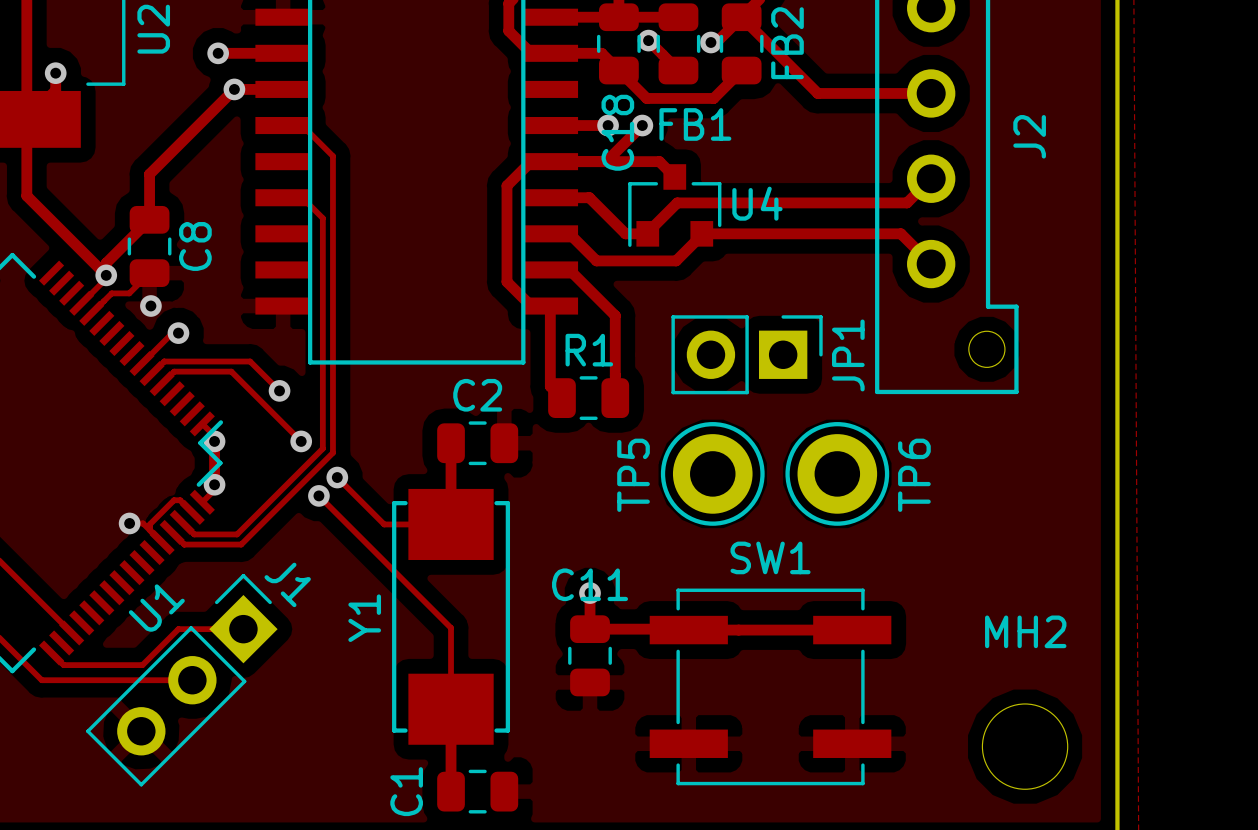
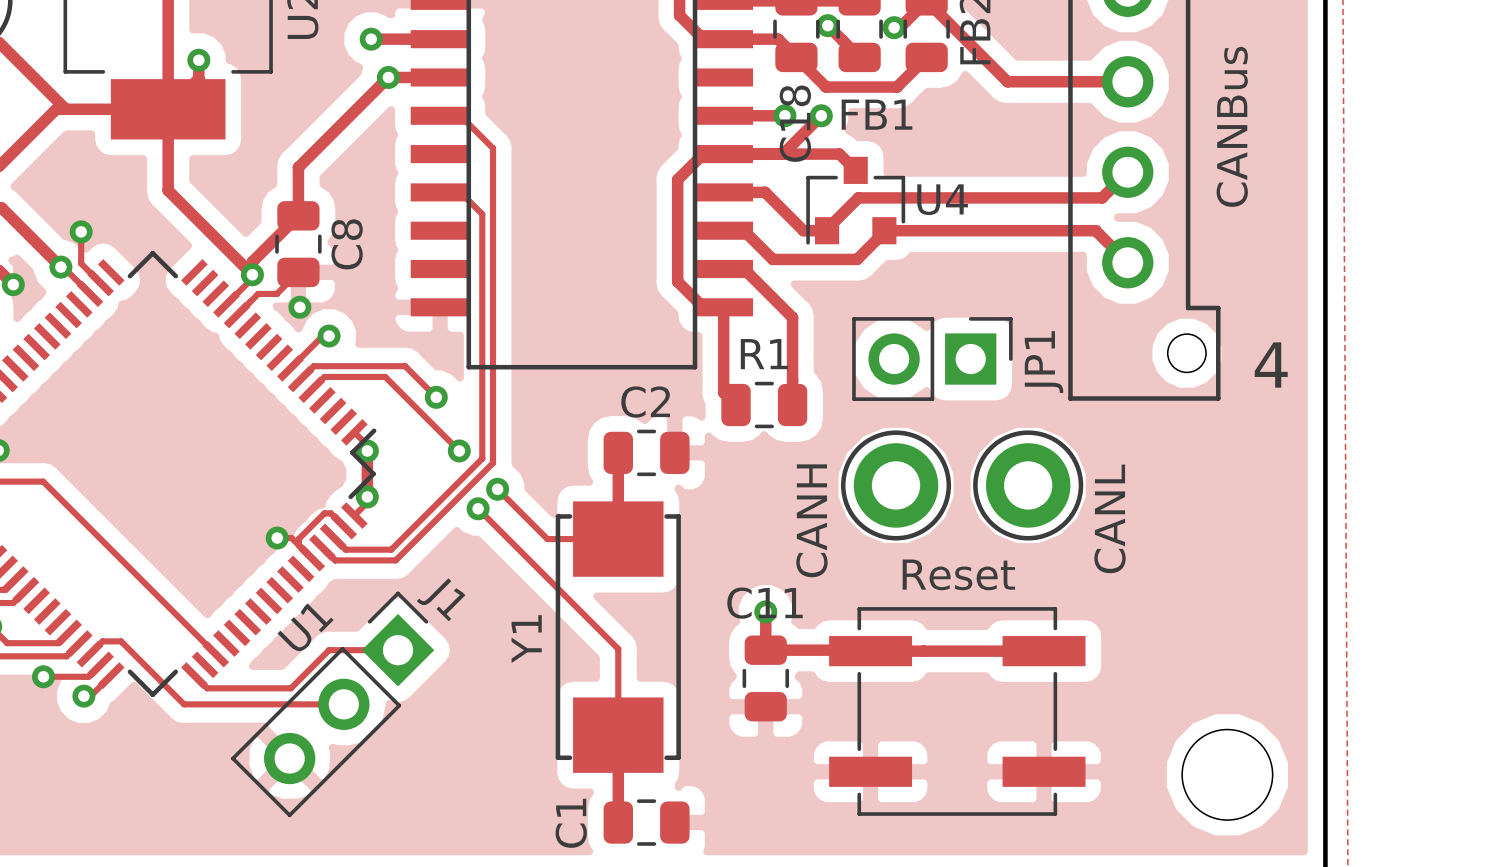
J2 name: J2 (1029, 136) -> CANBus (1232, 126)
text: none -> 4 (1271, 365)
TP5 name: TP5 (633, 475) -> CANH (811, 520)
TP6 name: TP6 (914, 475) -> CANL (1110, 518)
SW1 name: SW1 (770, 557) -> Reset (958, 574)
MH2 name: MH2 (1025, 631) -> none

